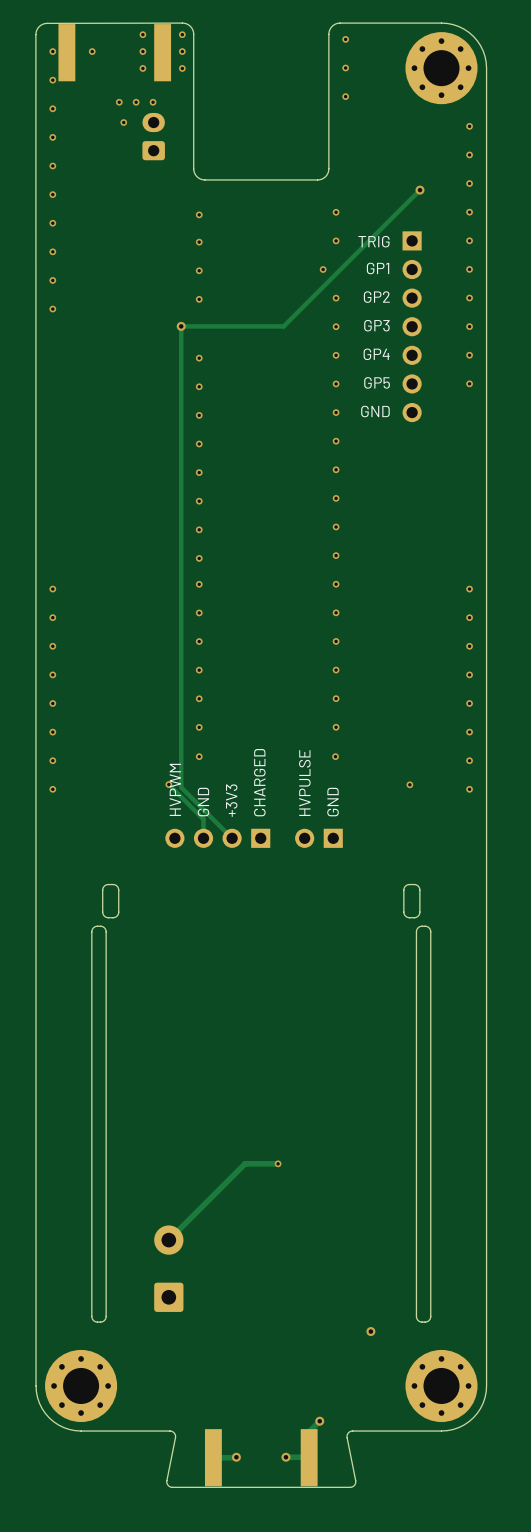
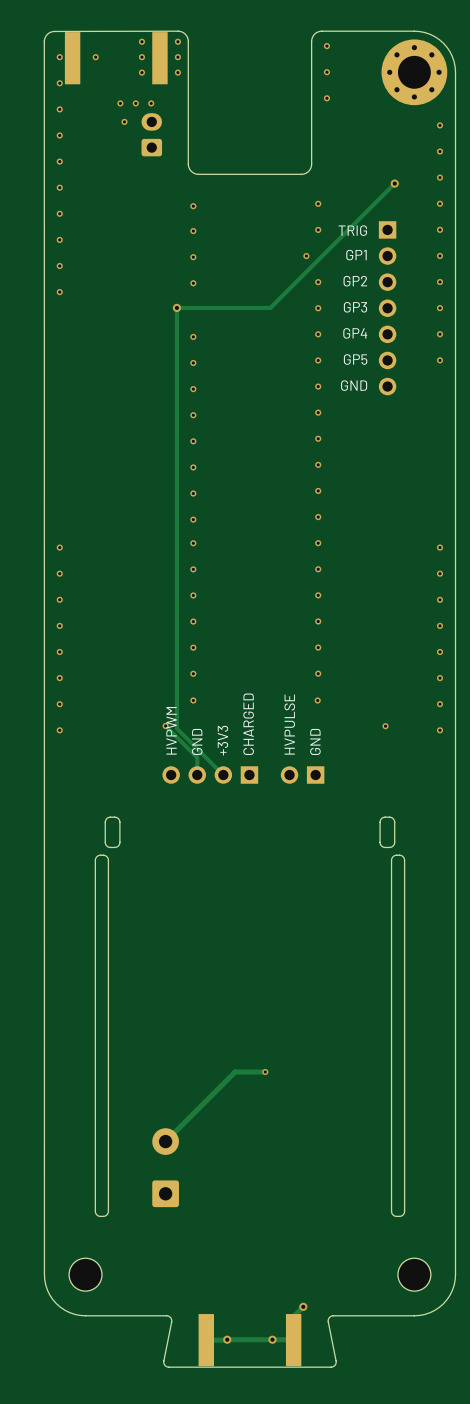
via: (370, 1331) -> none
part footprint: [45, 1349, 118, 1423] -> [69, 1258, 102, 1292]
part footprint: [405, 1349, 478, 1423] -> [397, 1258, 431, 1292]
track: none -> (272, 1339) (227, 1339)

